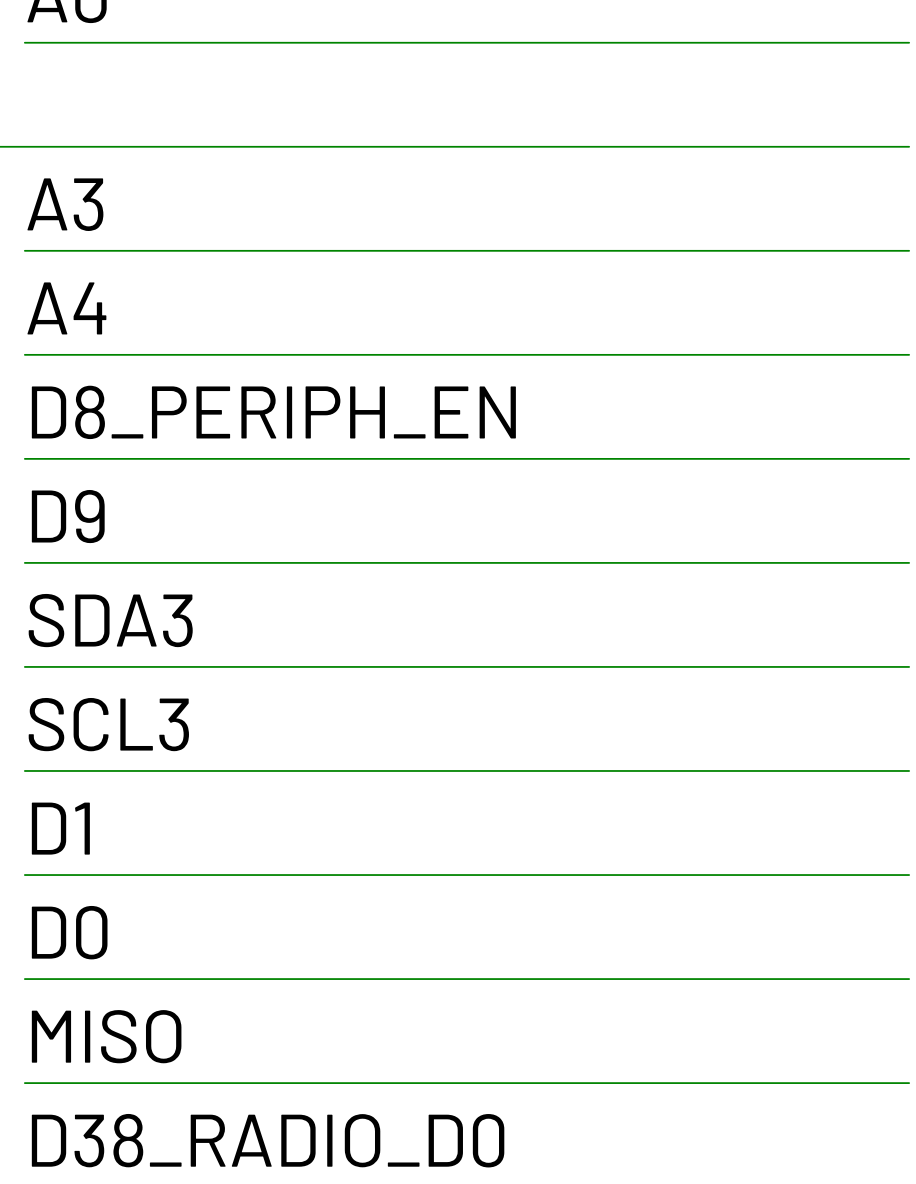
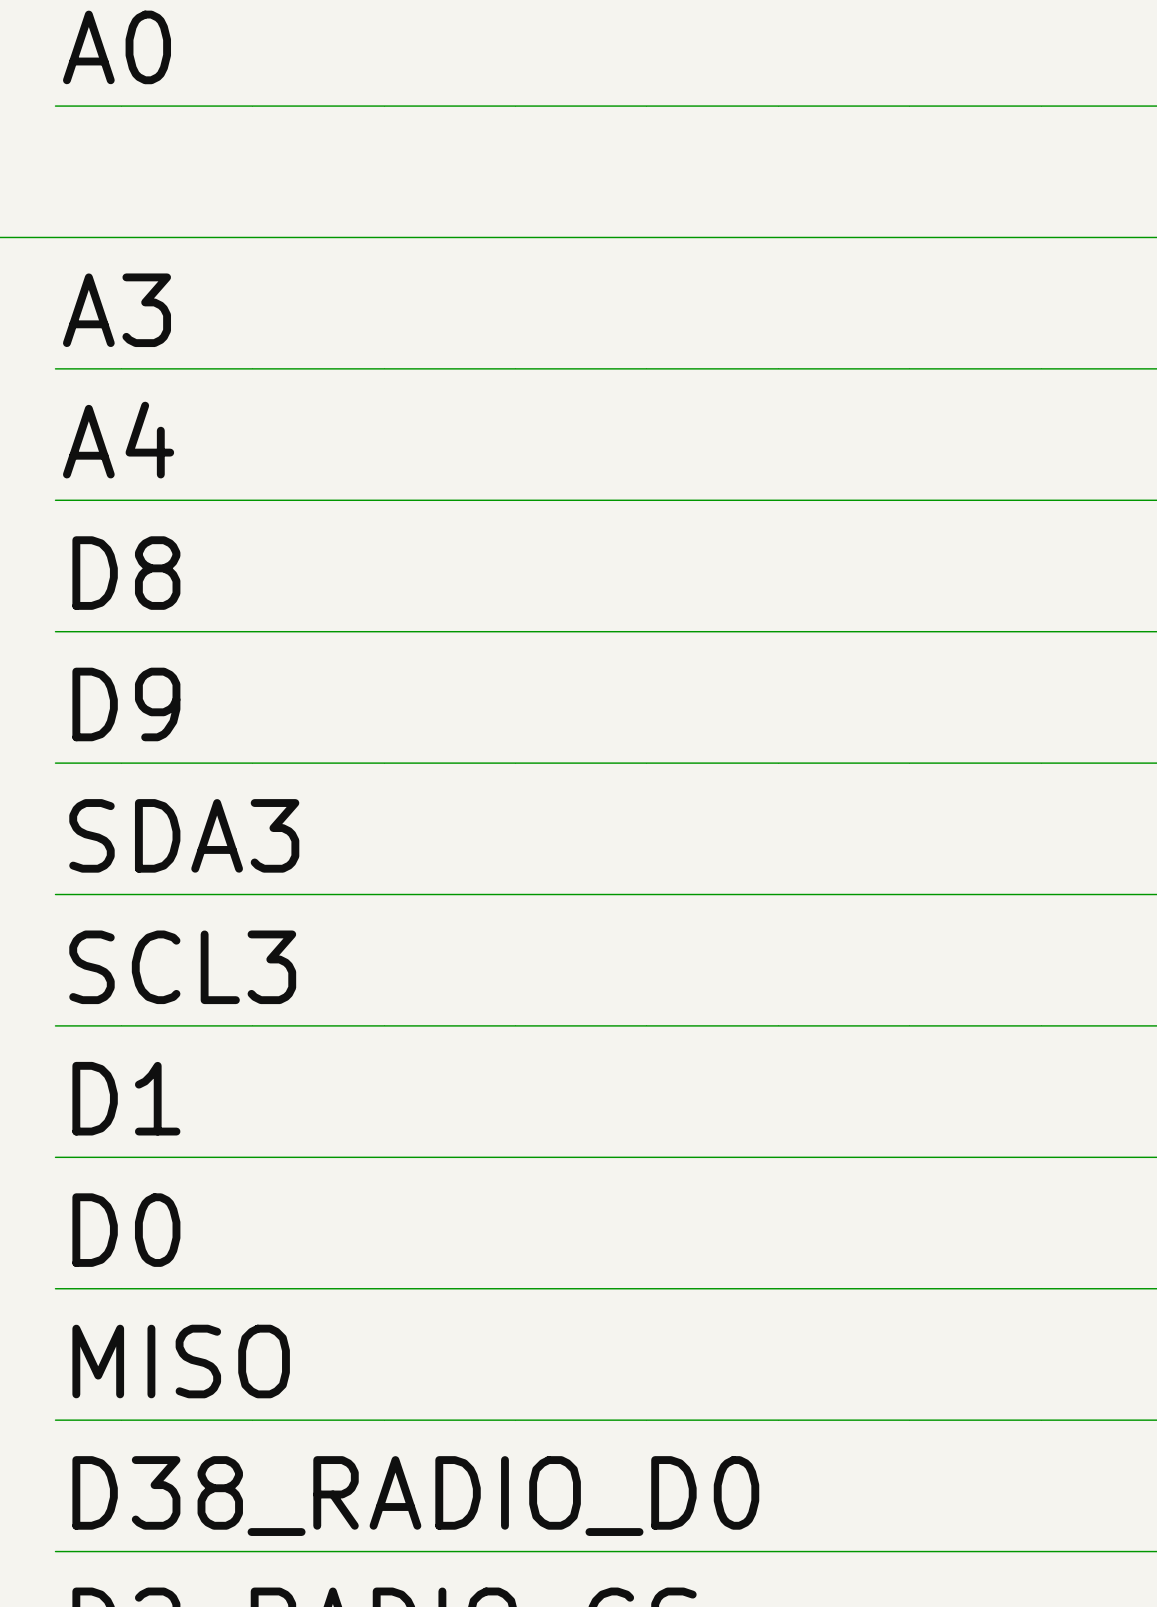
label: D8_PERIPH_EN (273, 412) -> D8 (126, 573)

